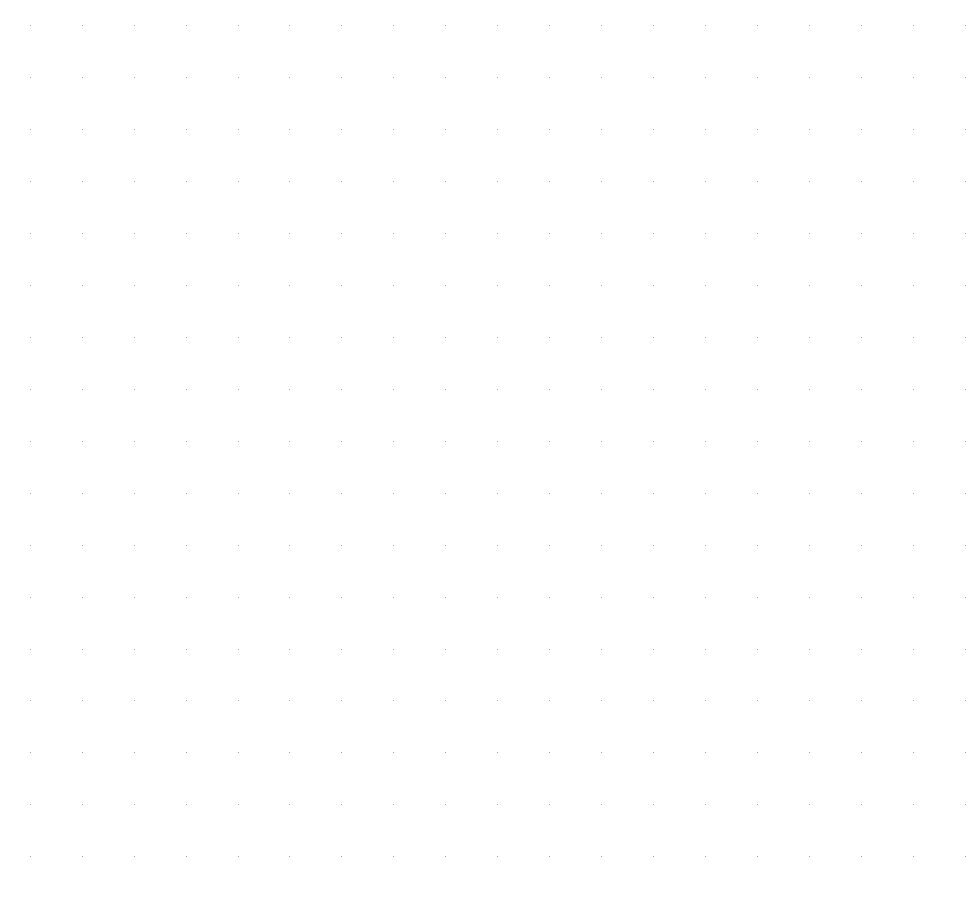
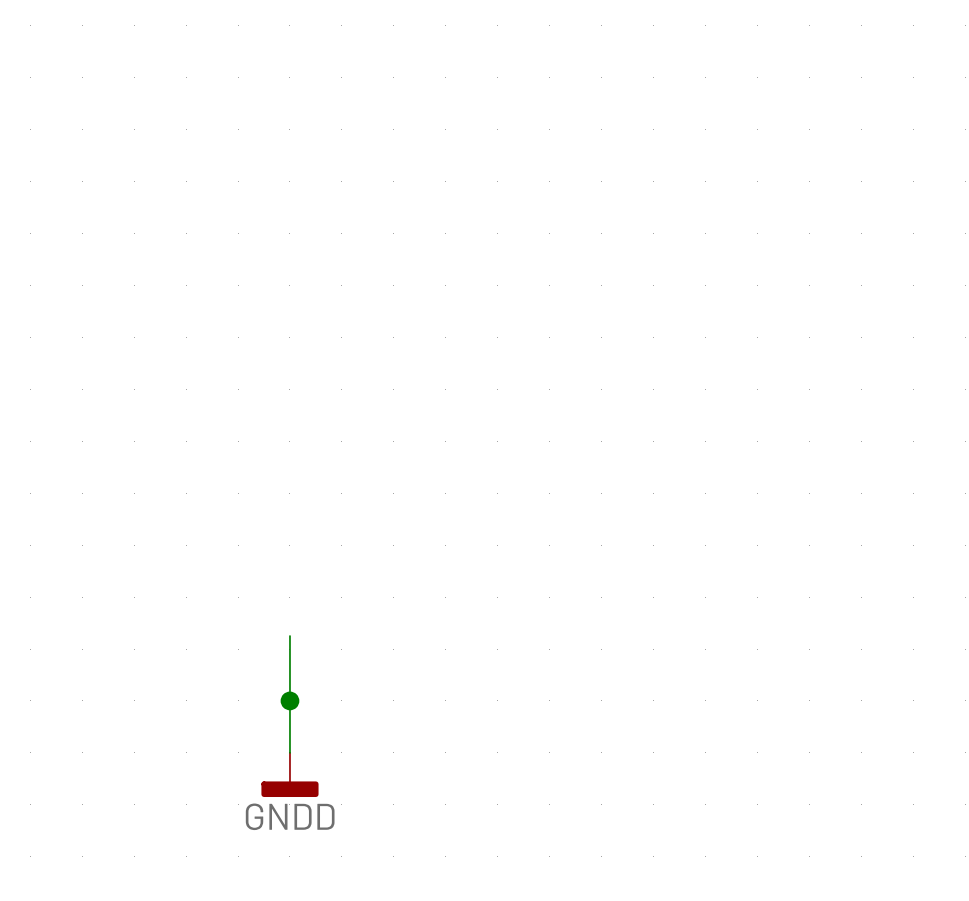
wire: none -> (289, 636) (289, 752)
junction: none -> (289, 700)
power symbol: none -> GNDD (289, 774)

